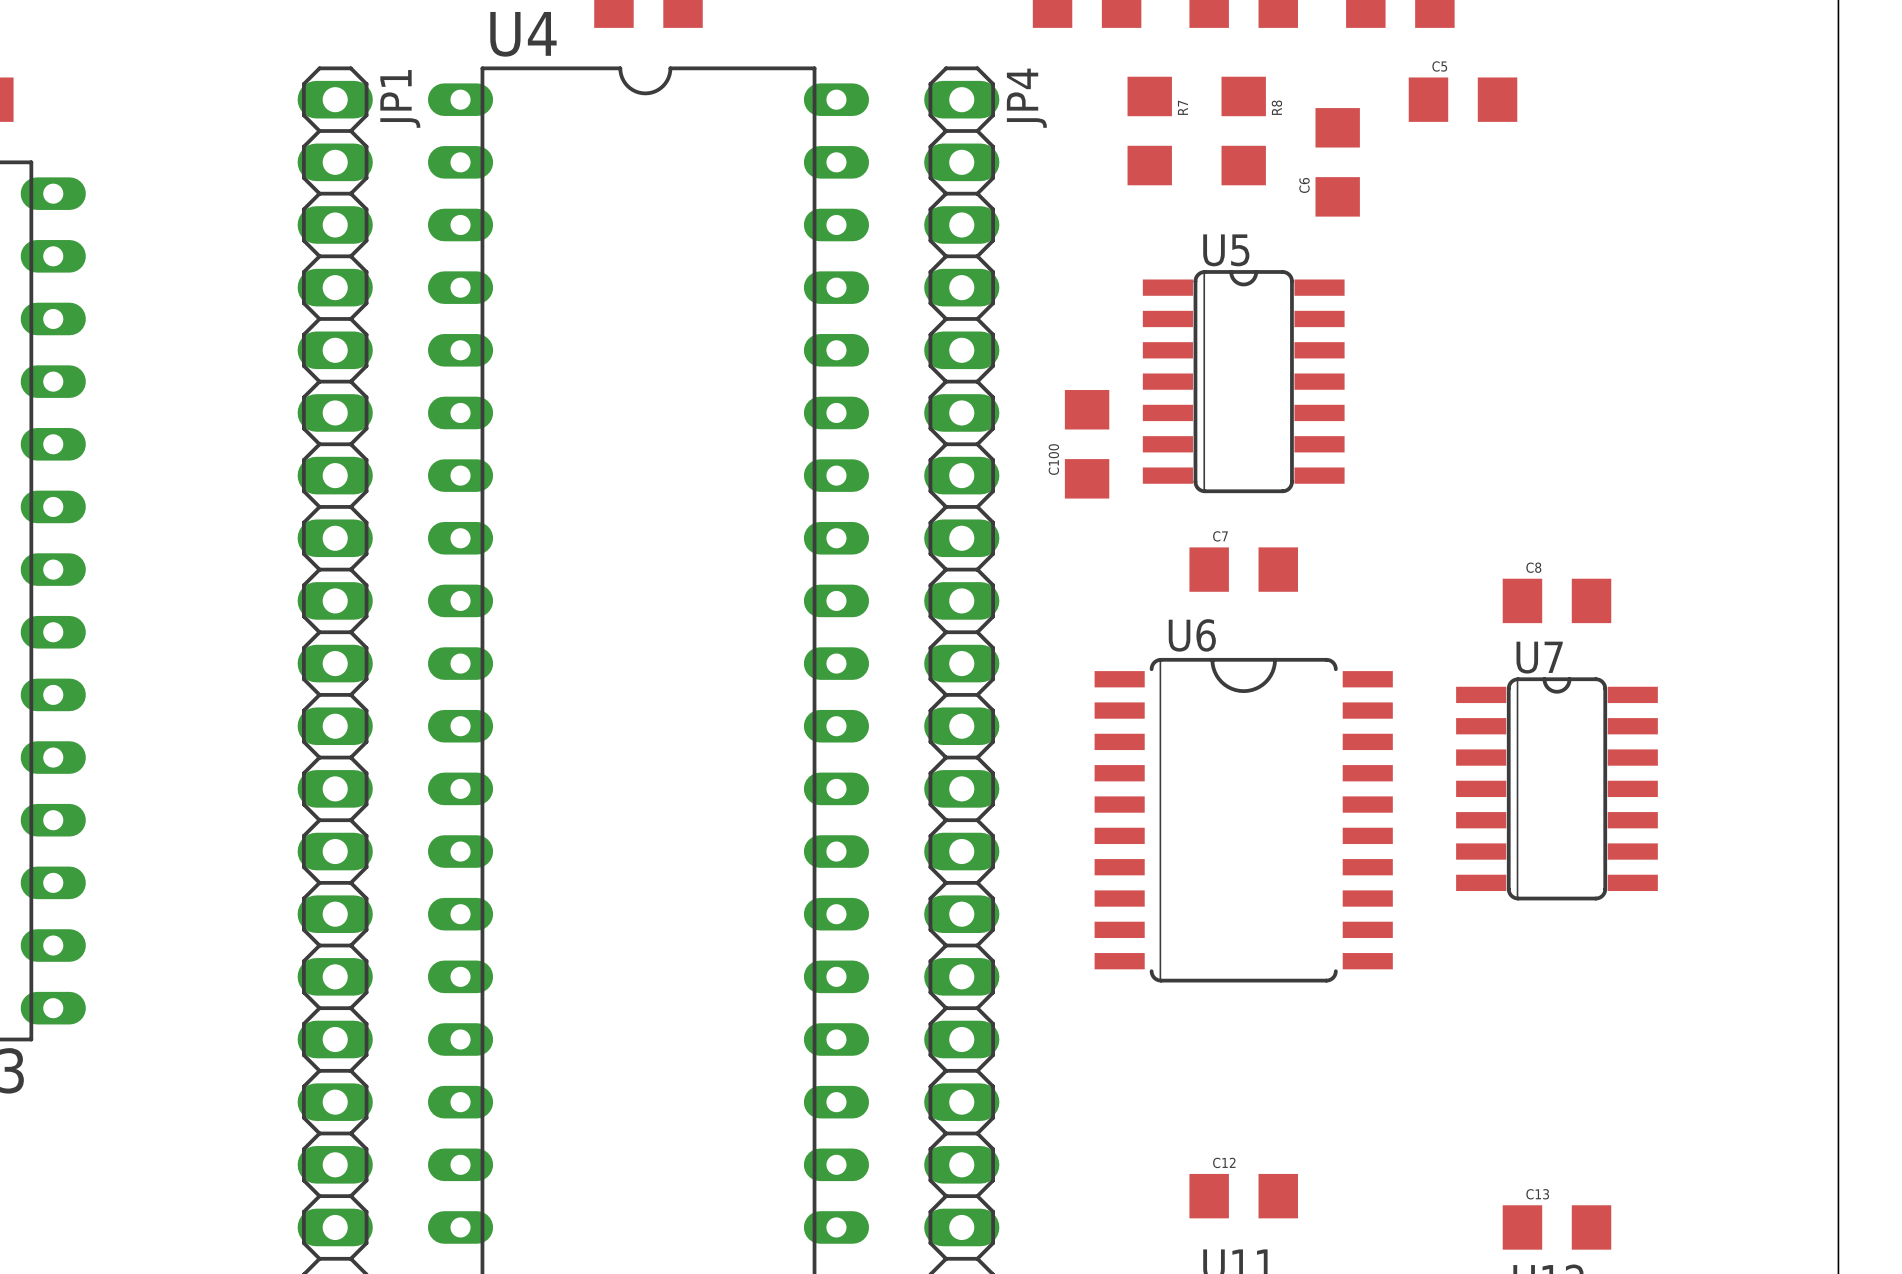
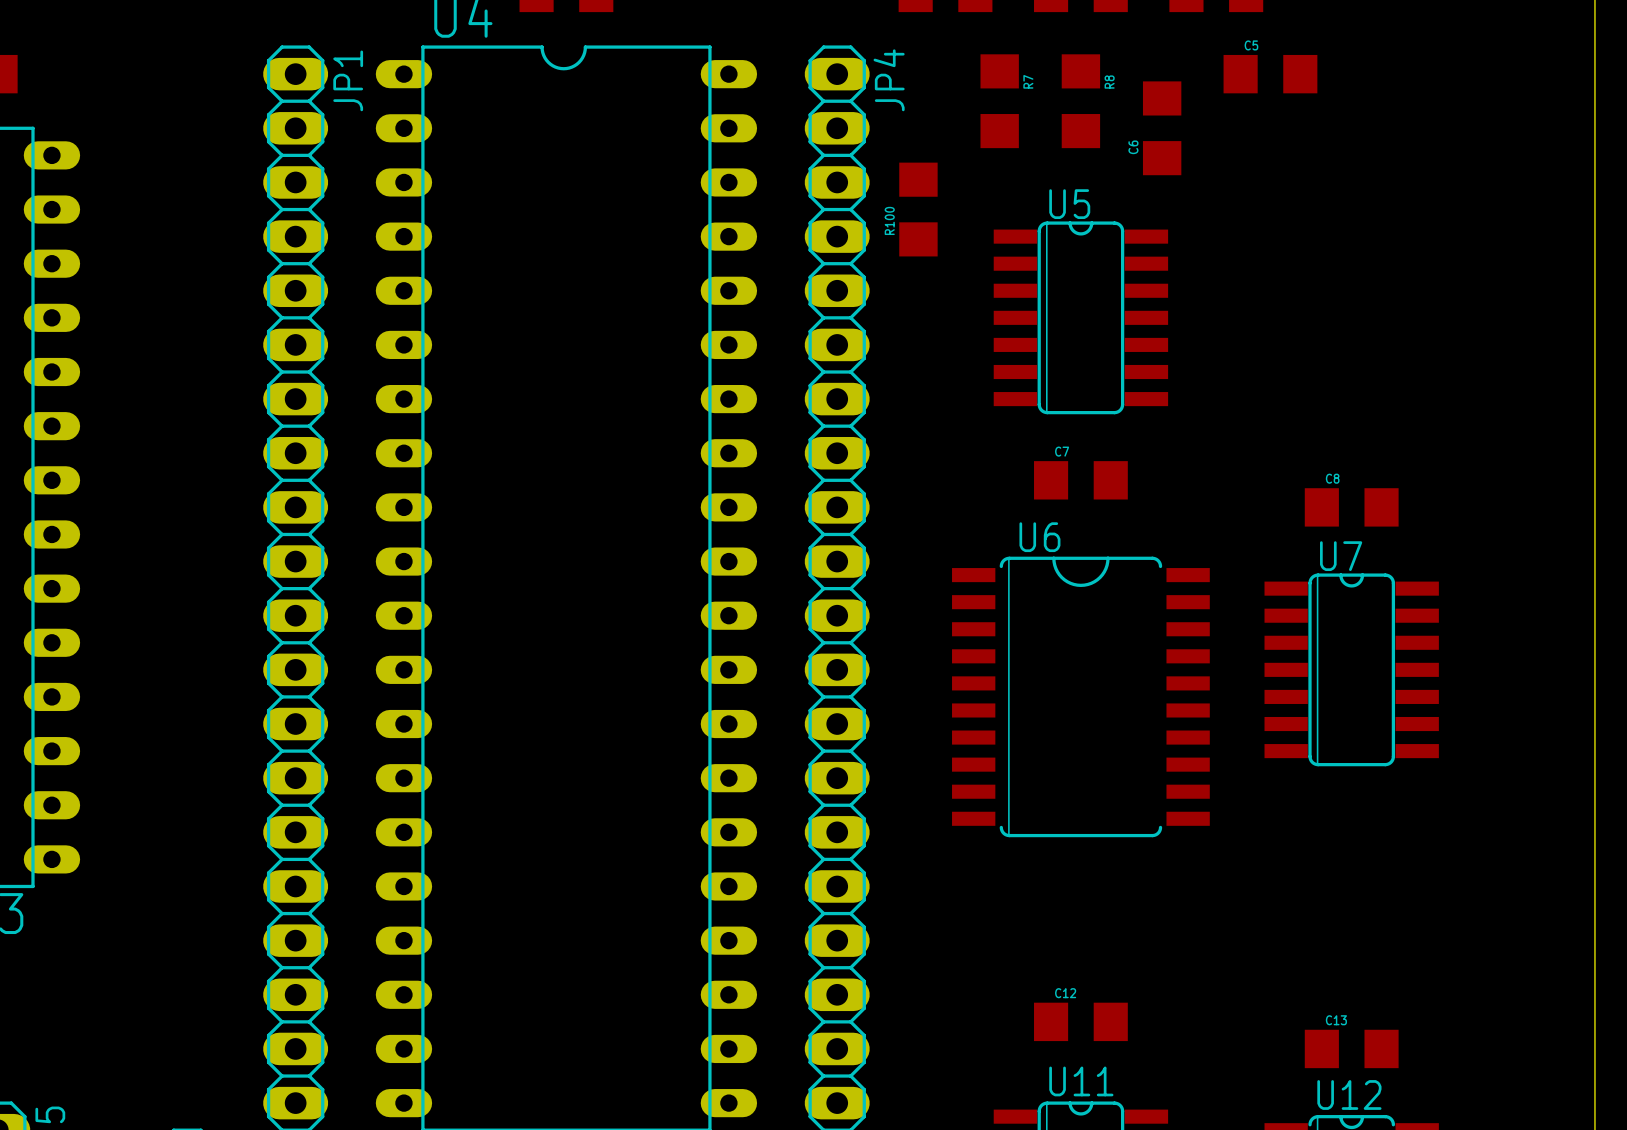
R100: none -> (918, 209)
C100: (1087, 444) -> none

